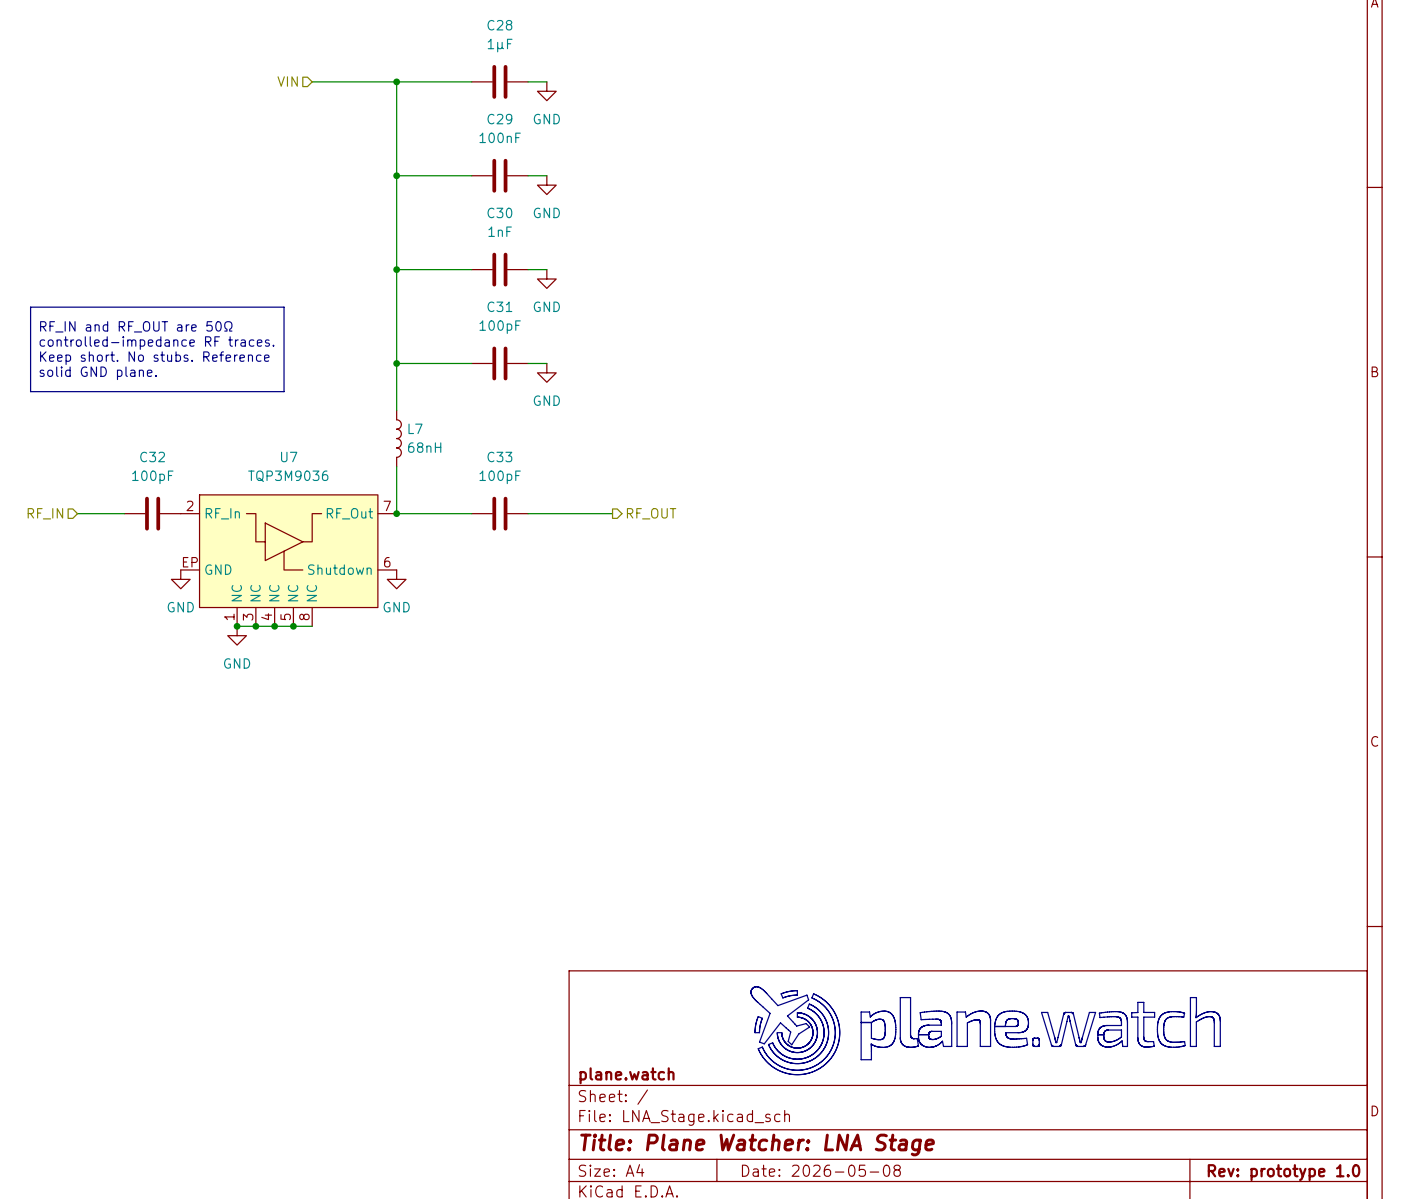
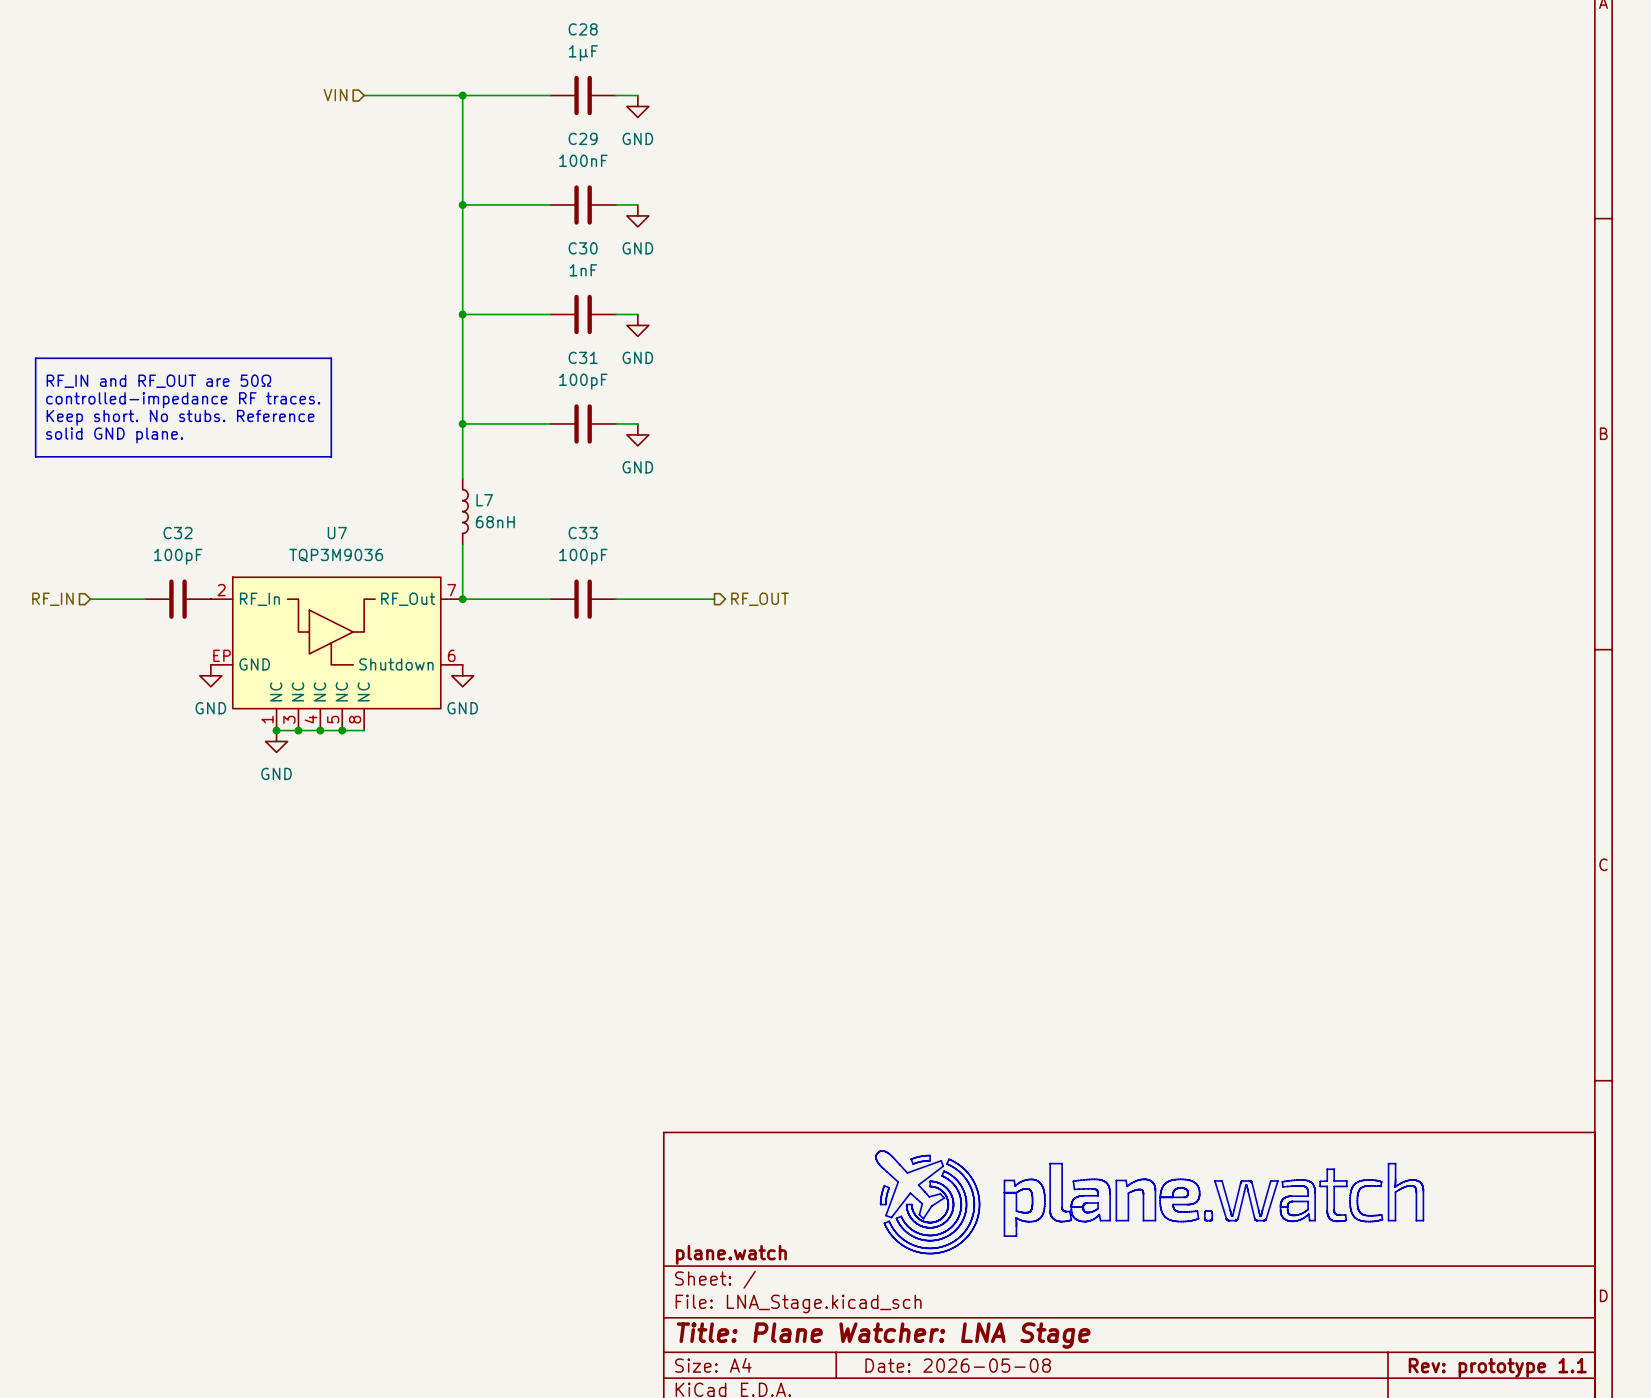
title block: Rev: prototype 1.0 (1284, 1172) -> Rev: prototype 1.1 (1497, 1367)

